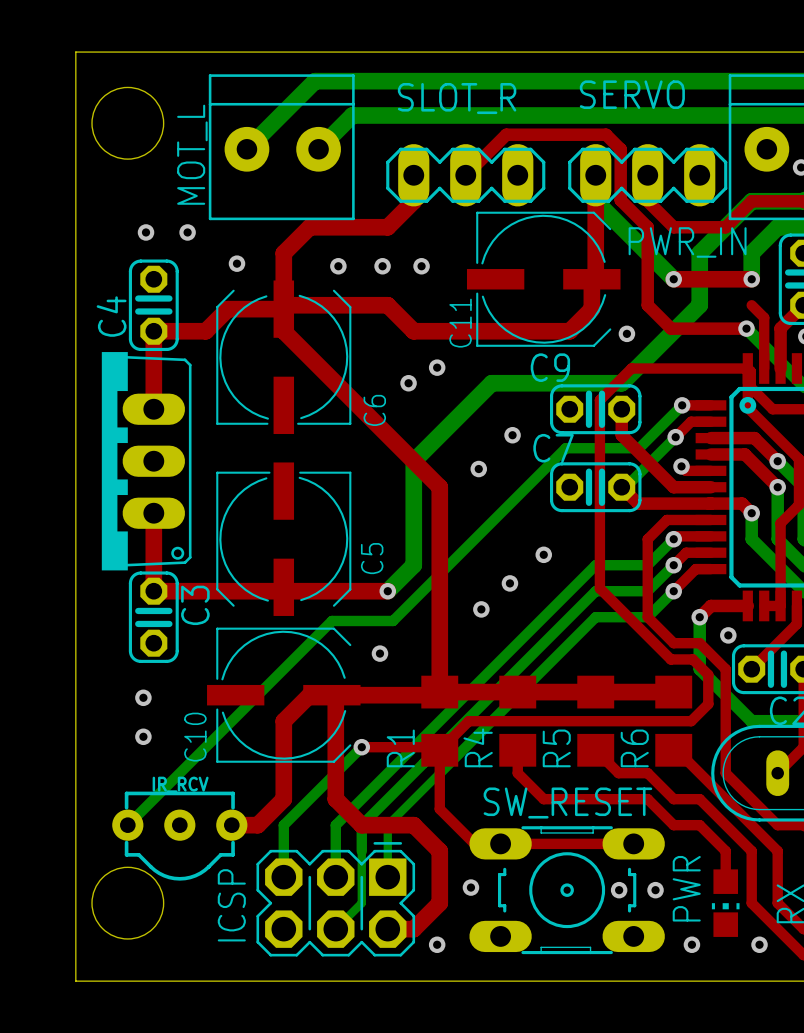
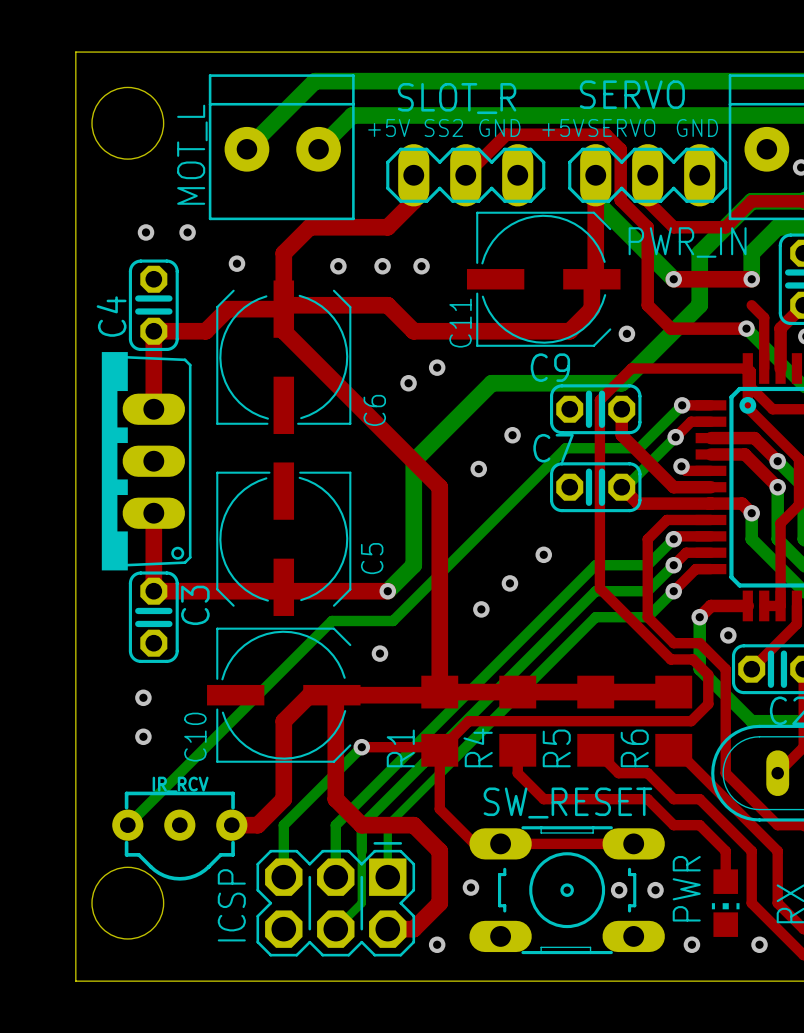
text: none -> +5V (389, 127)
text: none -> SS2 (443, 127)
text: none -> GND (499, 127)
text: none -> +5V (563, 127)
text: none -> SERVO (621, 127)
text: none -> GND (697, 127)

